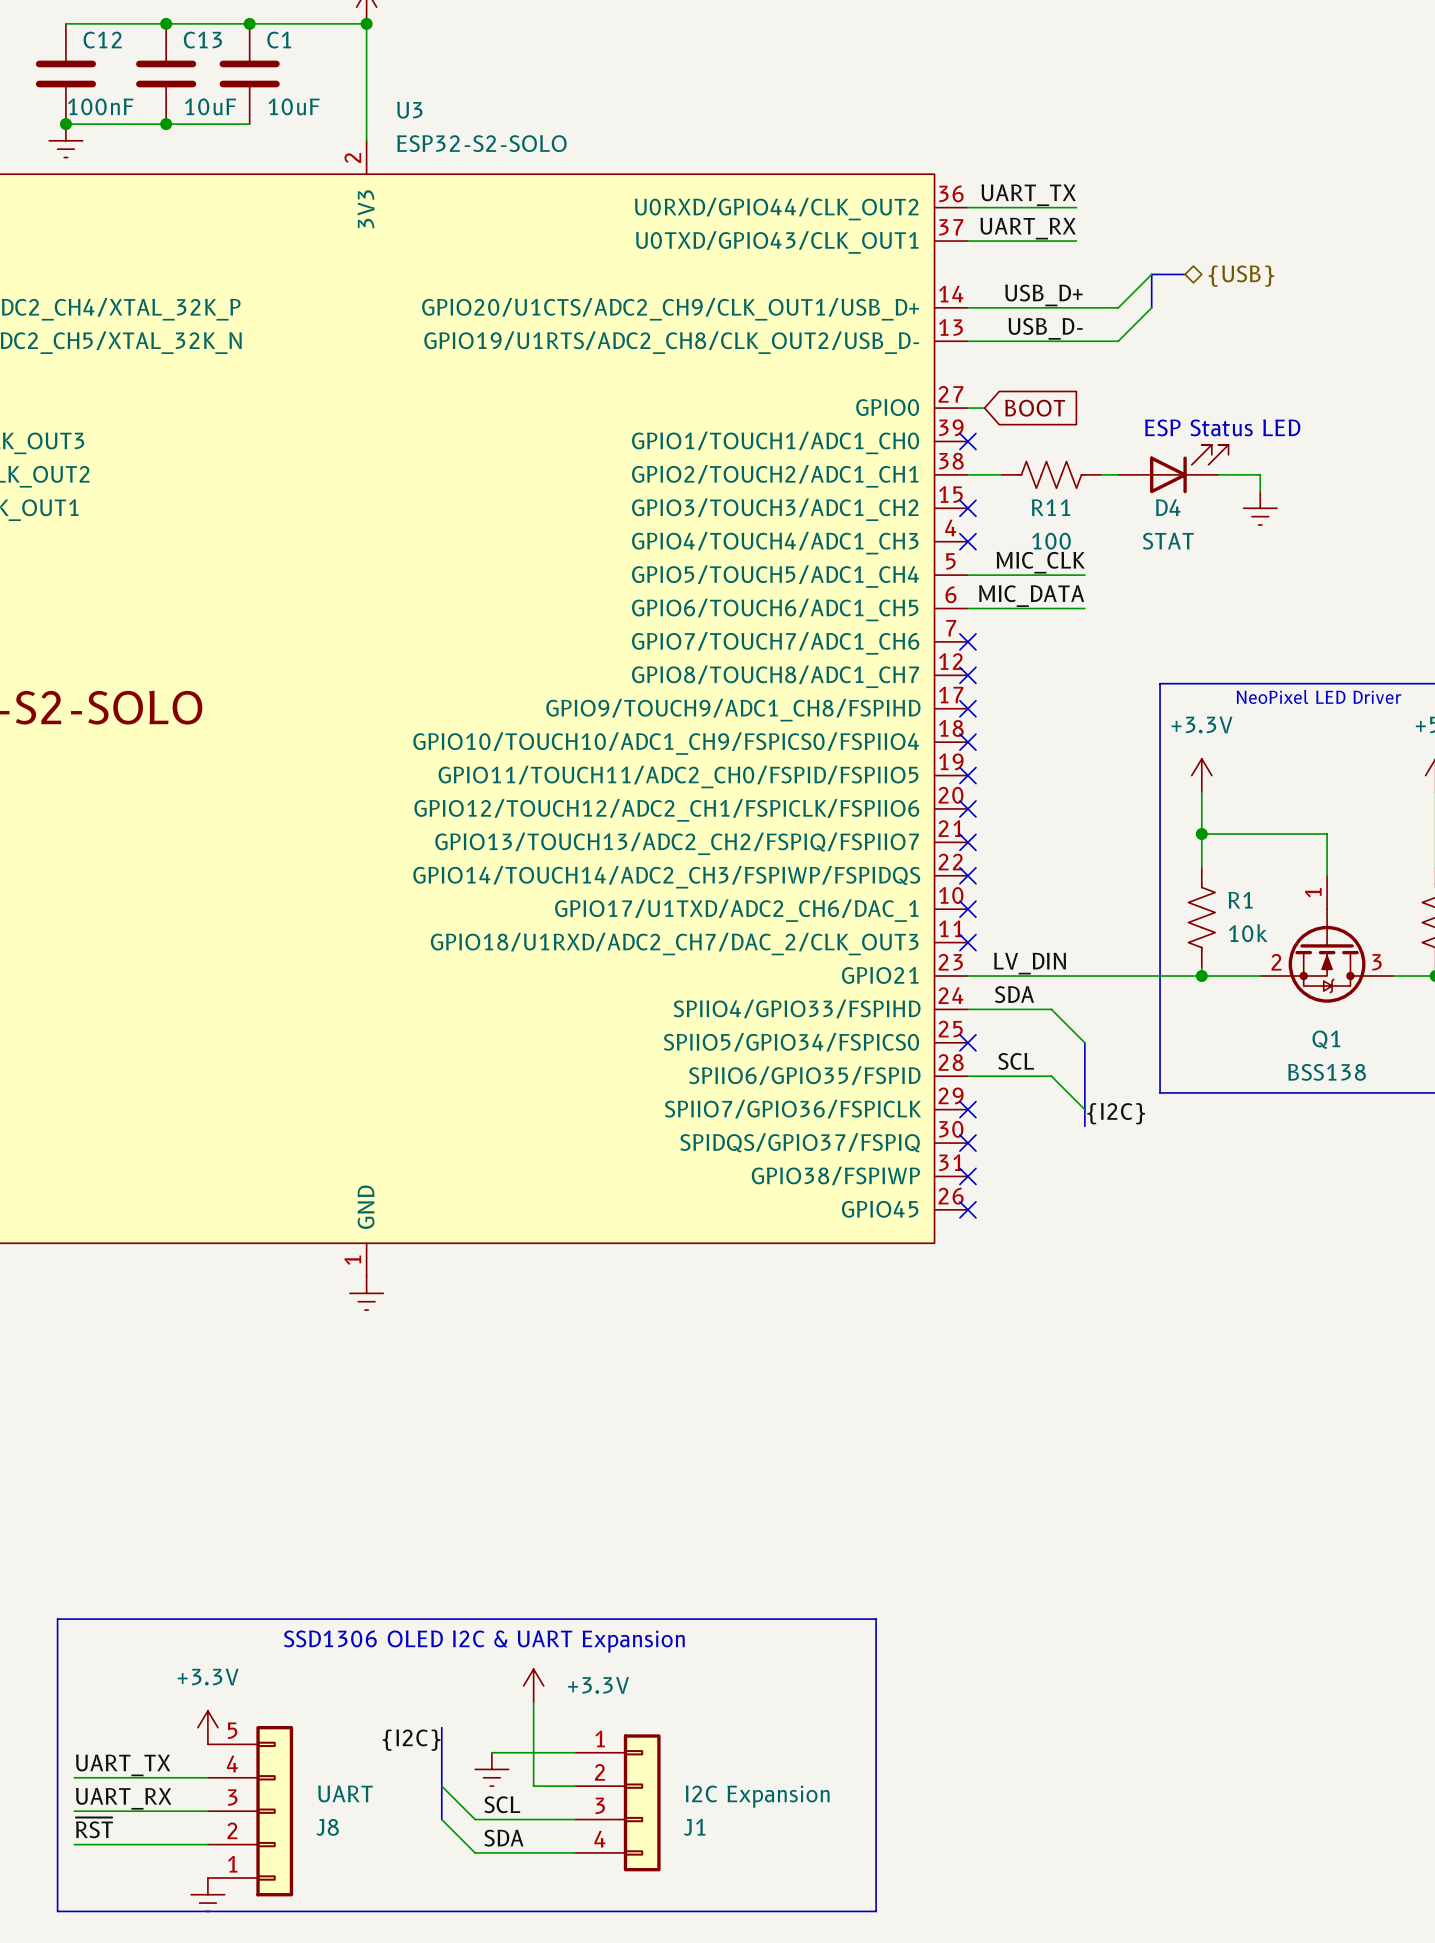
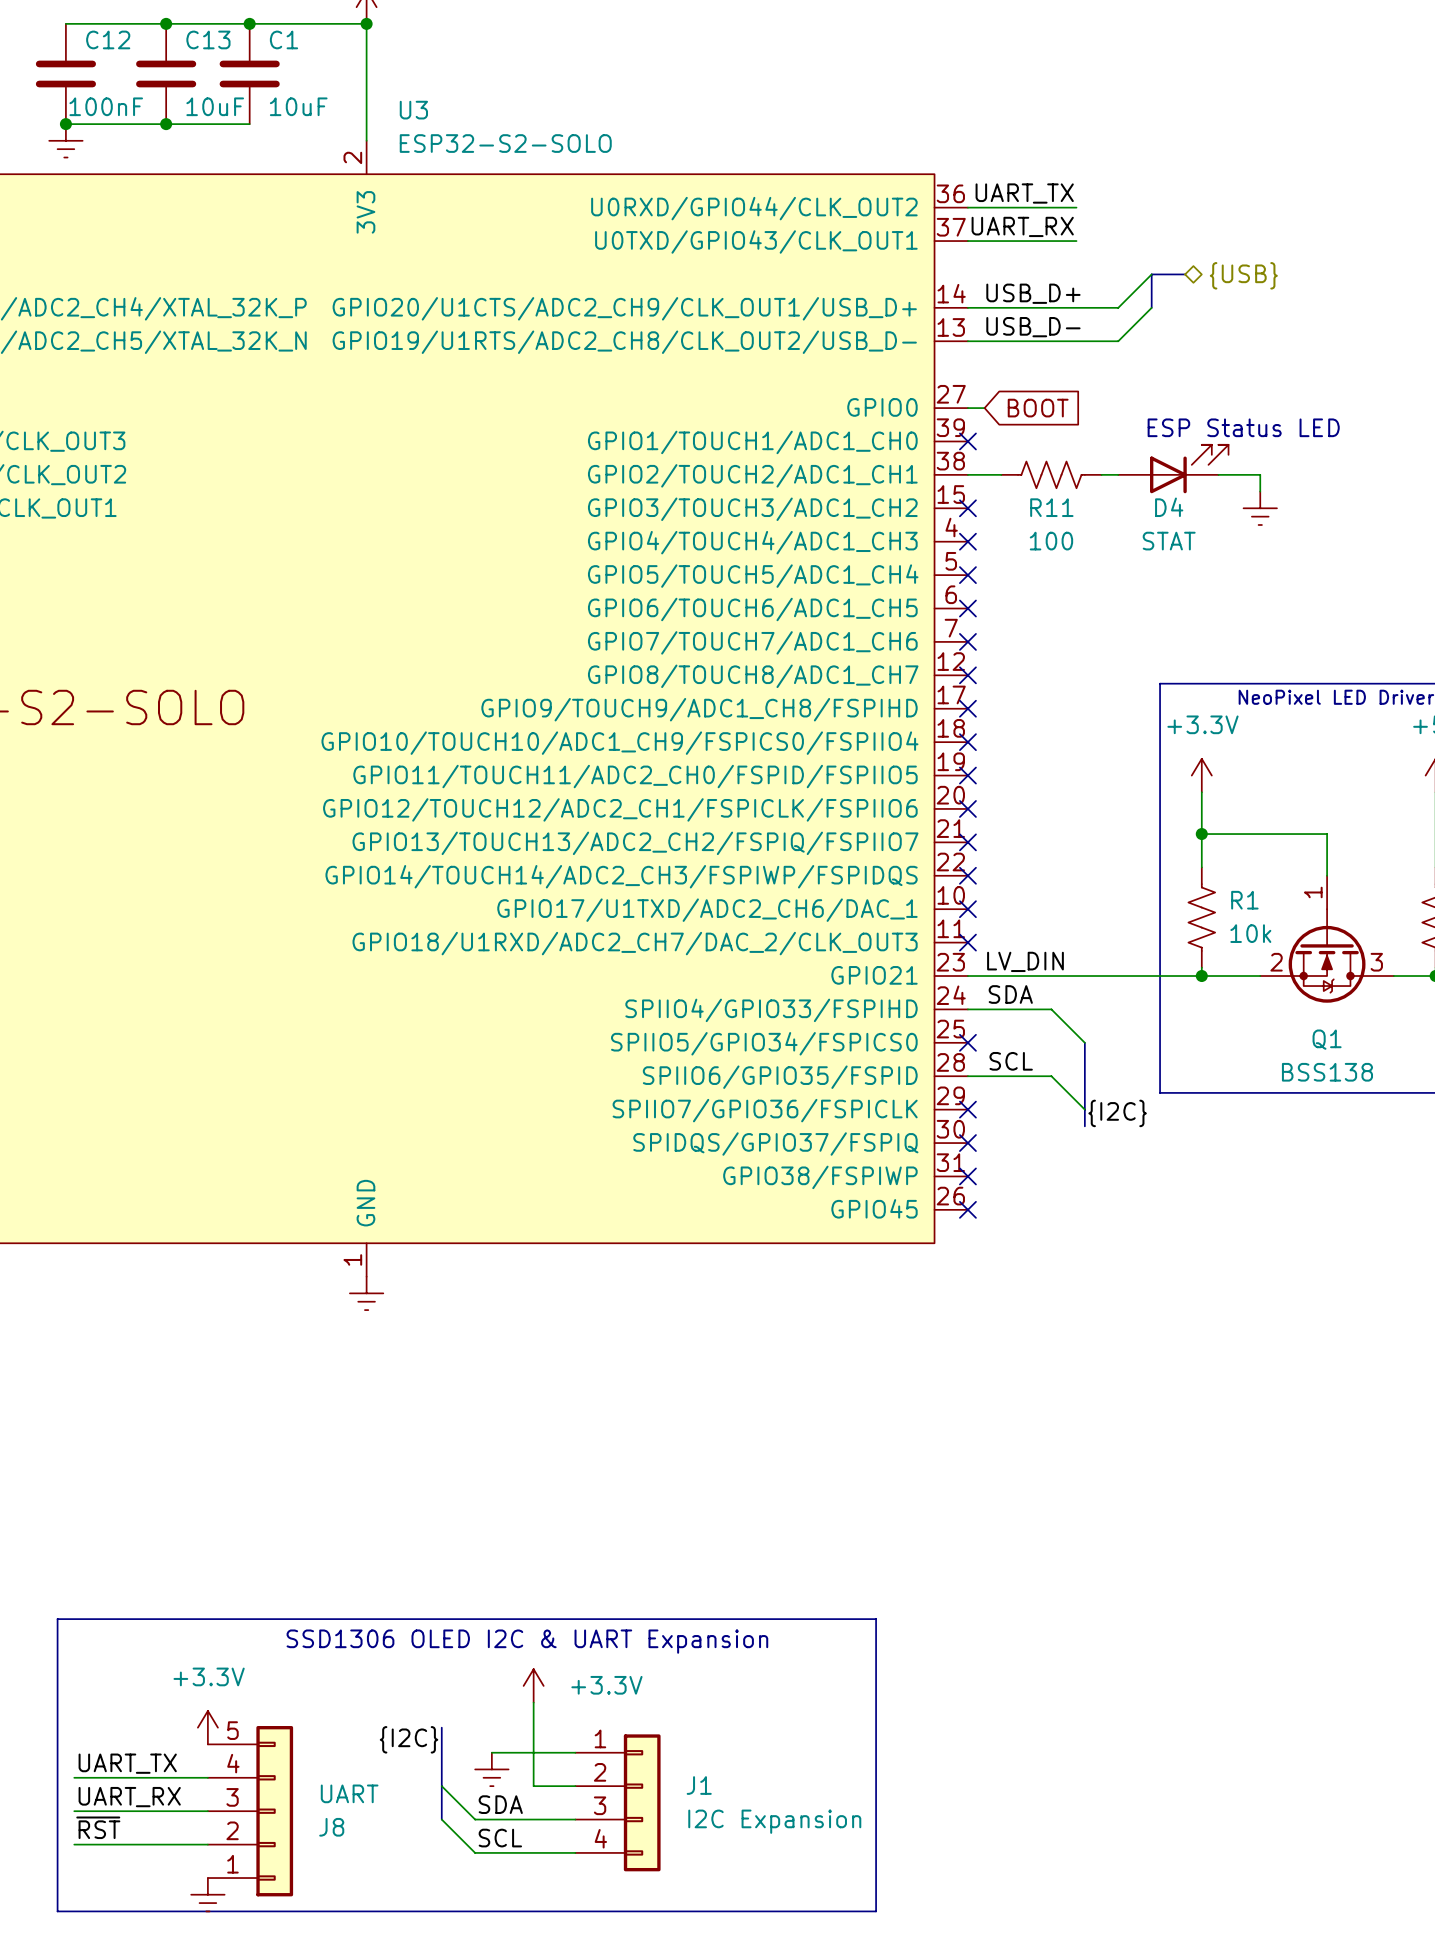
label: MIC_CLK (1040, 562) -> none
wire: (967, 575) (1084, 575) -> none
no-connect mark: none -> (967, 575)
label: MIC_DATA (1031, 596) -> none
wire: (967, 608) (1084, 608) -> none
no-connect mark: none -> (967, 608)
J1 value position: I2C Expansion (757, 1796) -> I2C Expansion (774, 1821)
label: SCL (502, 1804) -> SDA (500, 1804)
J1 name position: J1 (694, 1827) -> J1 (699, 1785)
label: SDA (503, 1838) -> SCL (500, 1838)

